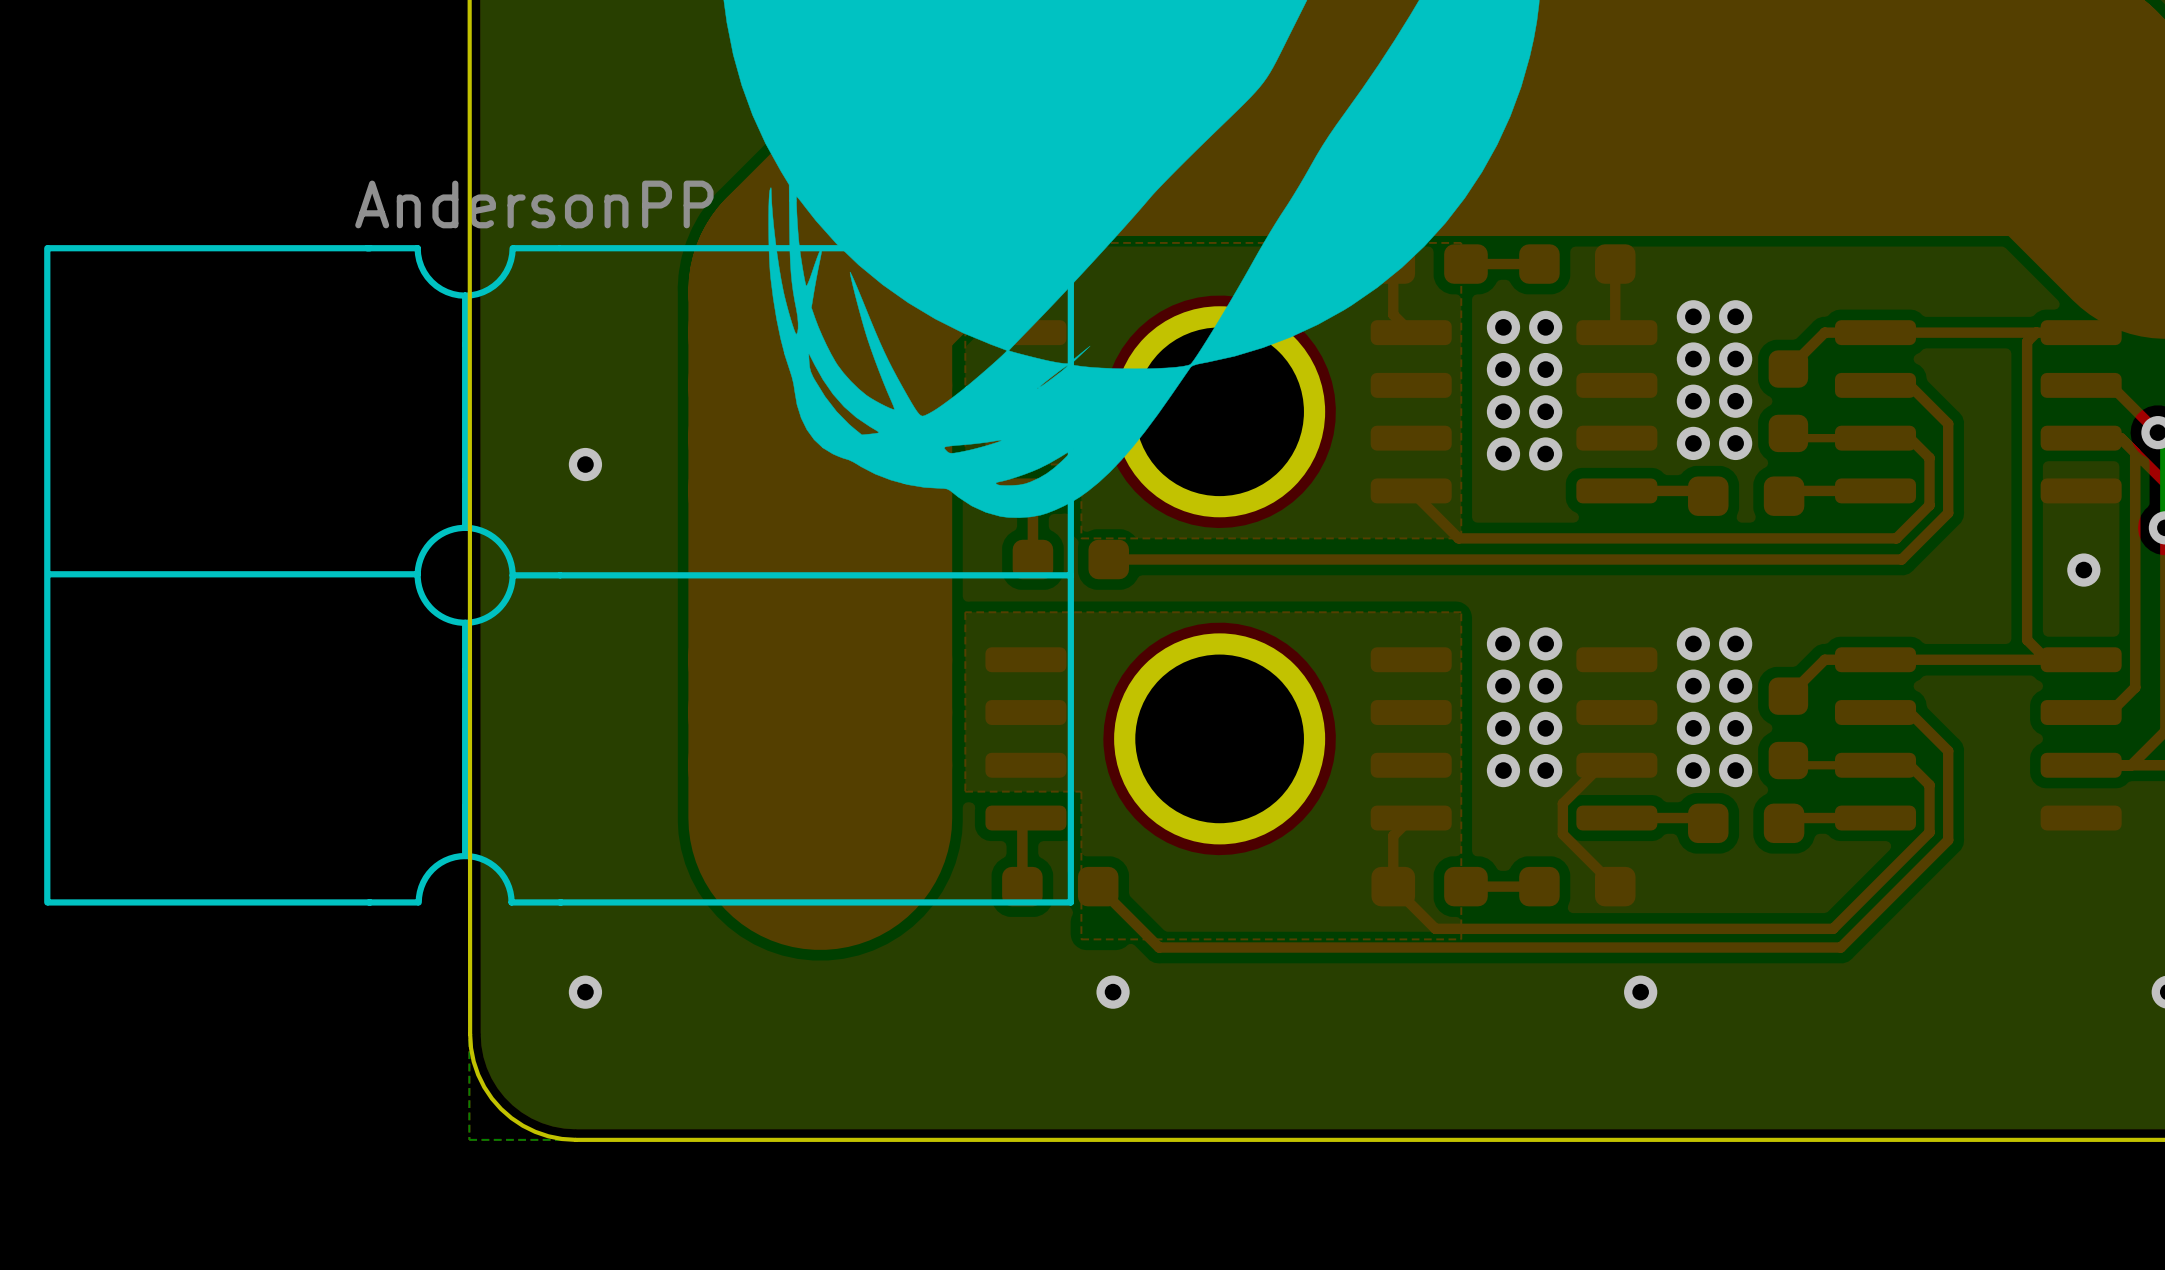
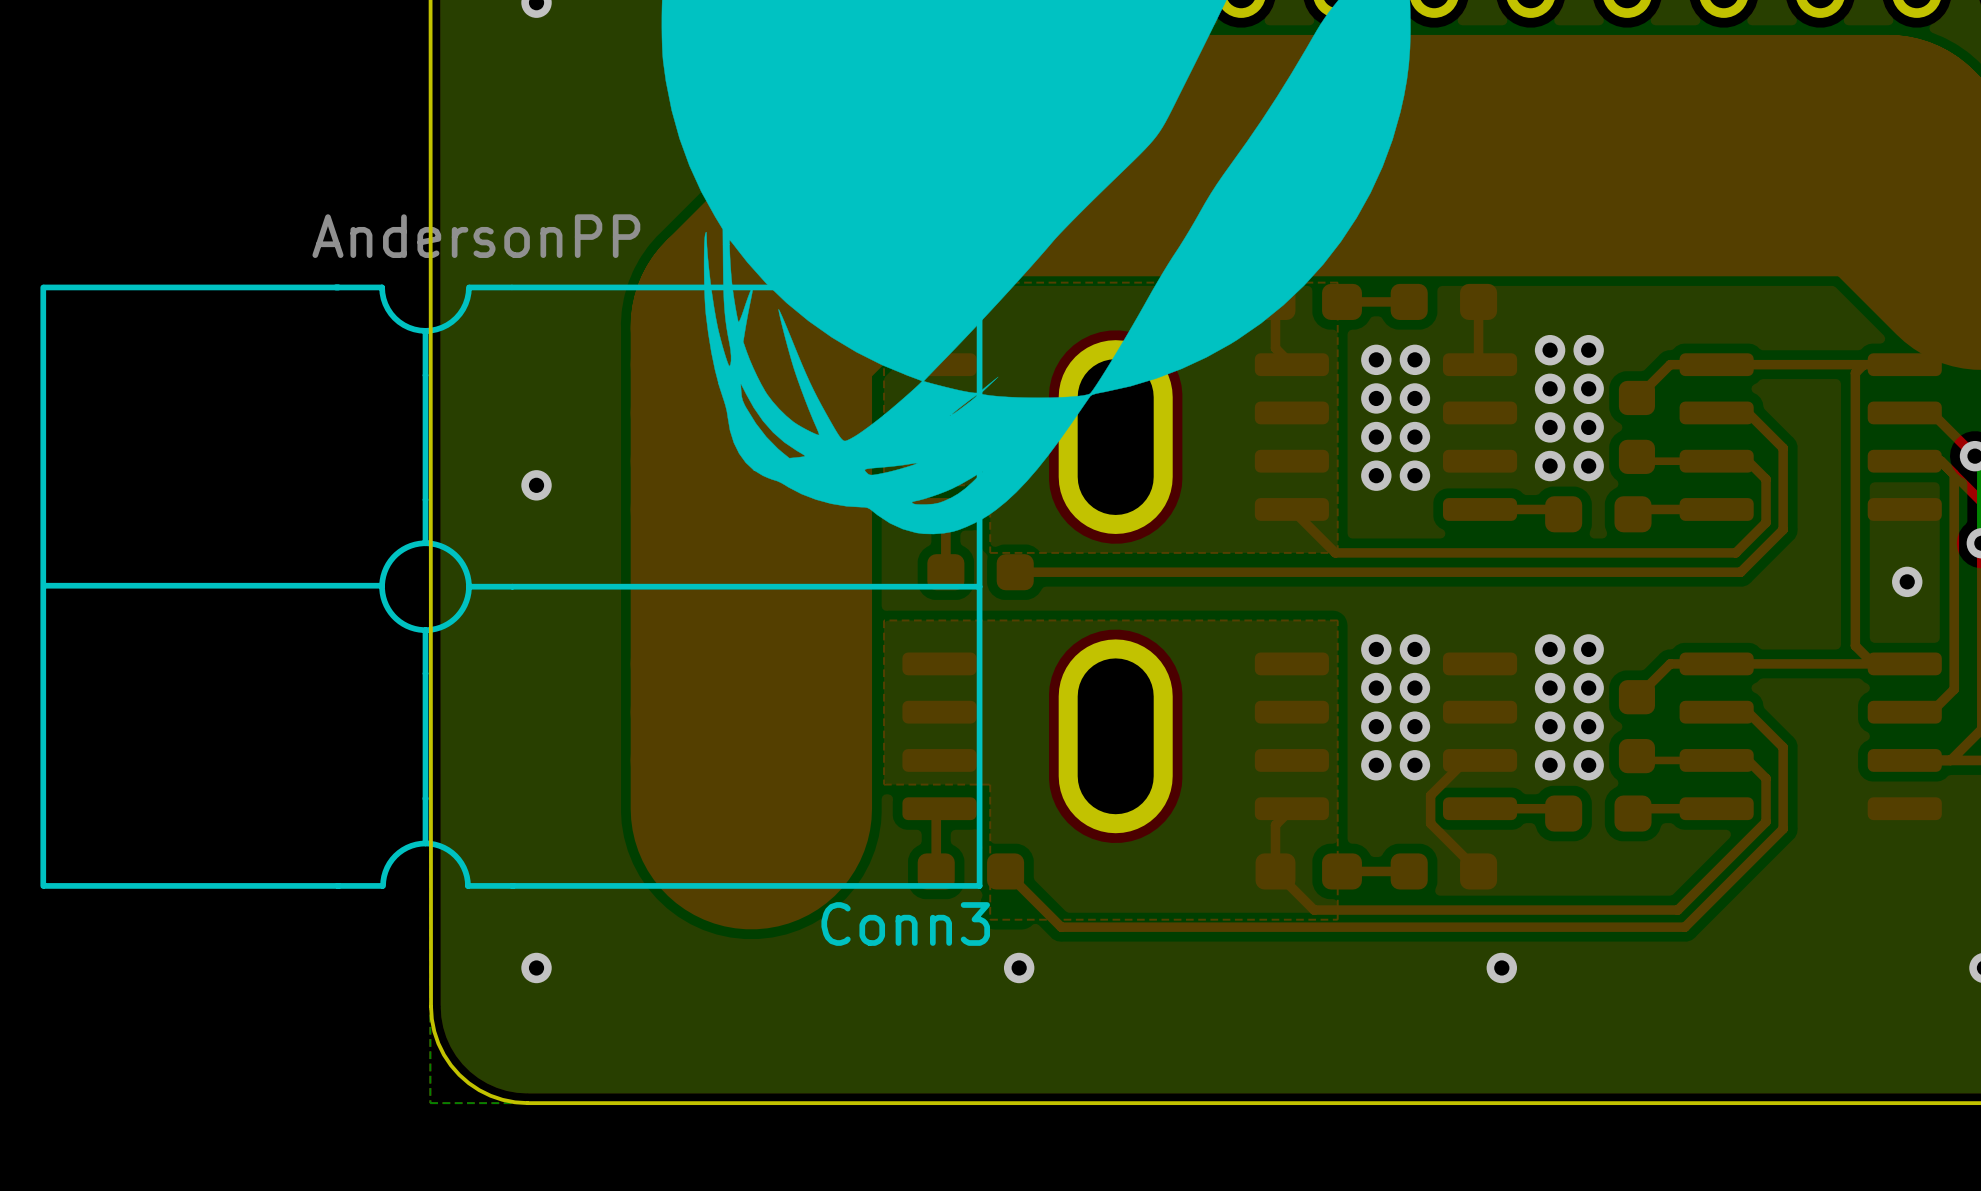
Conn3: none -> AndersonPP (606, 586)
part: AndersonPP (684, 575) -> none

